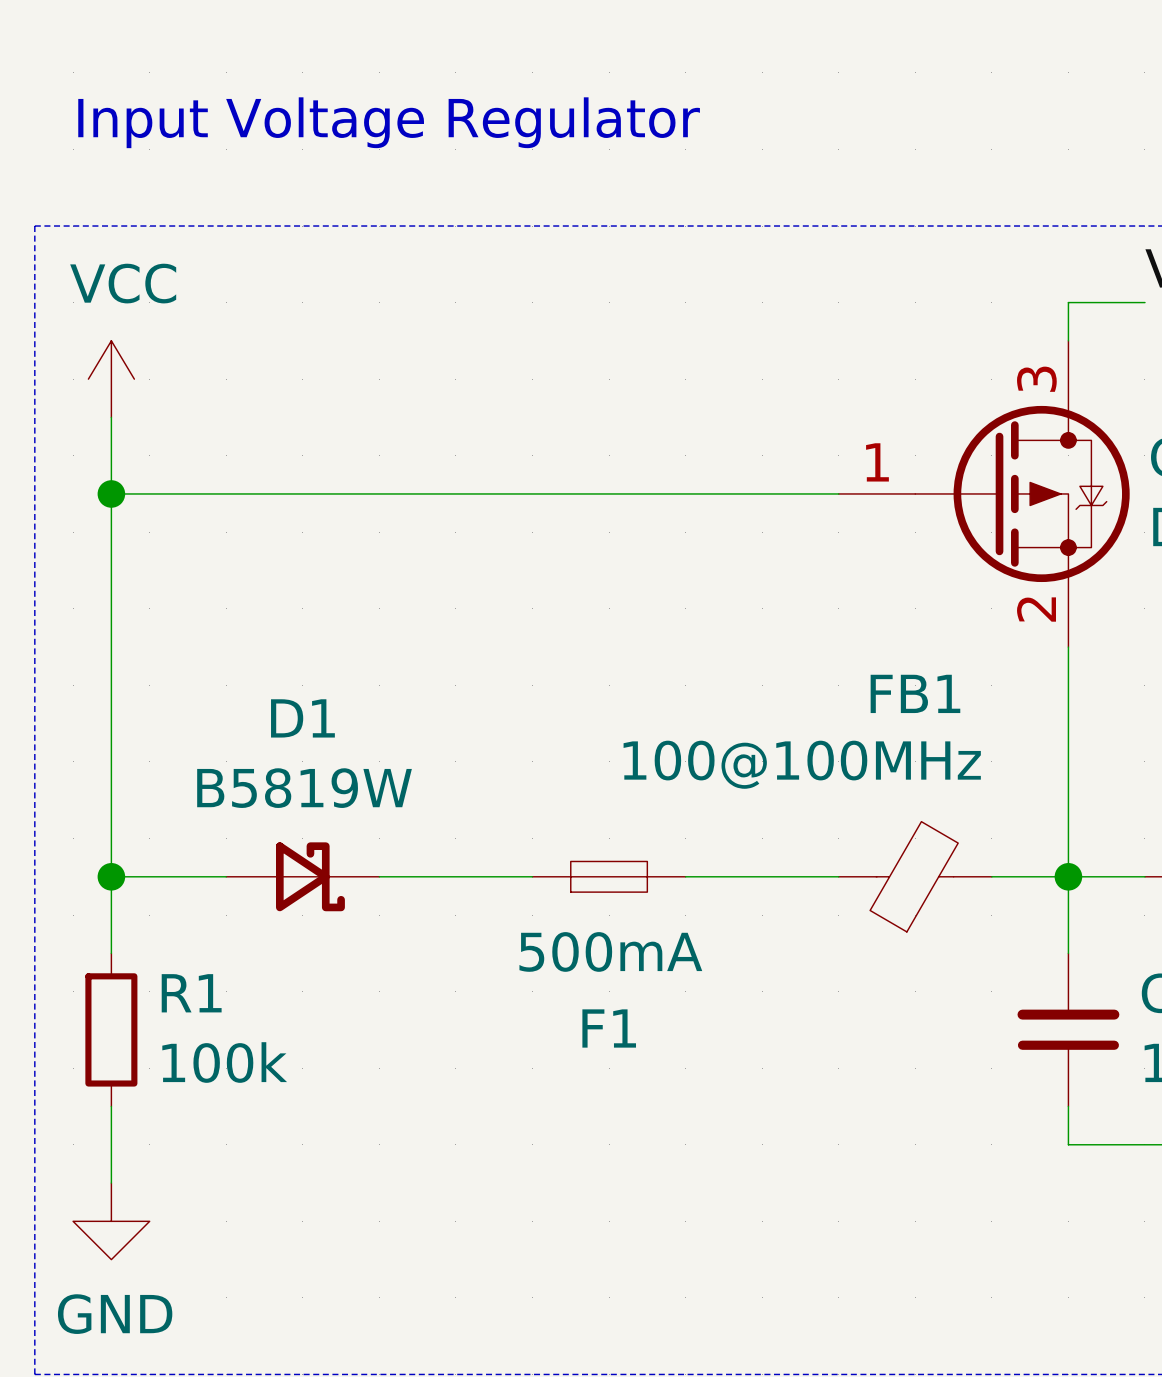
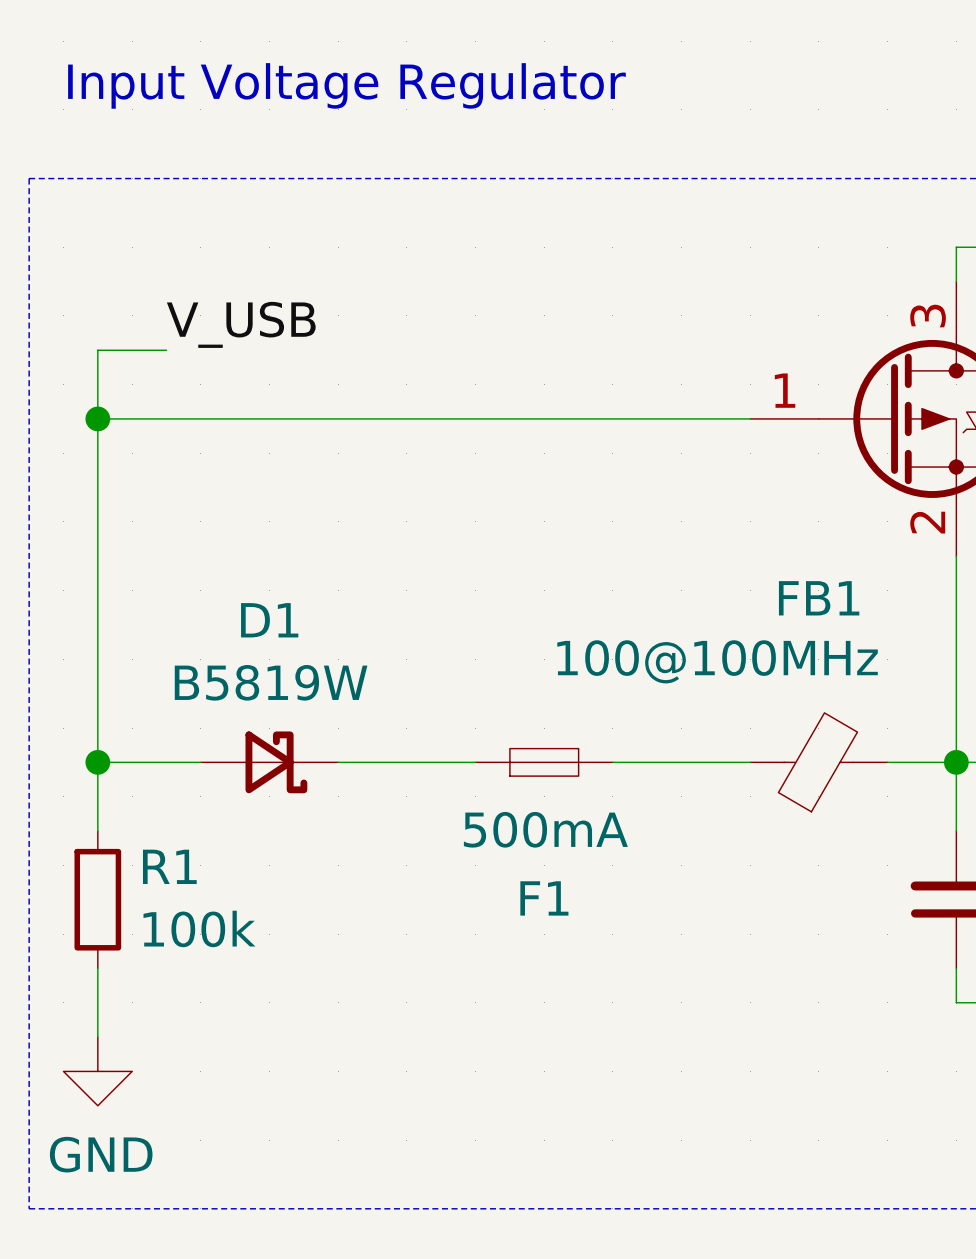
power symbol: VCC (111, 379) -> none
label: none -> V_USB (241, 324)
wire: none -> (97, 350) (166, 350)

